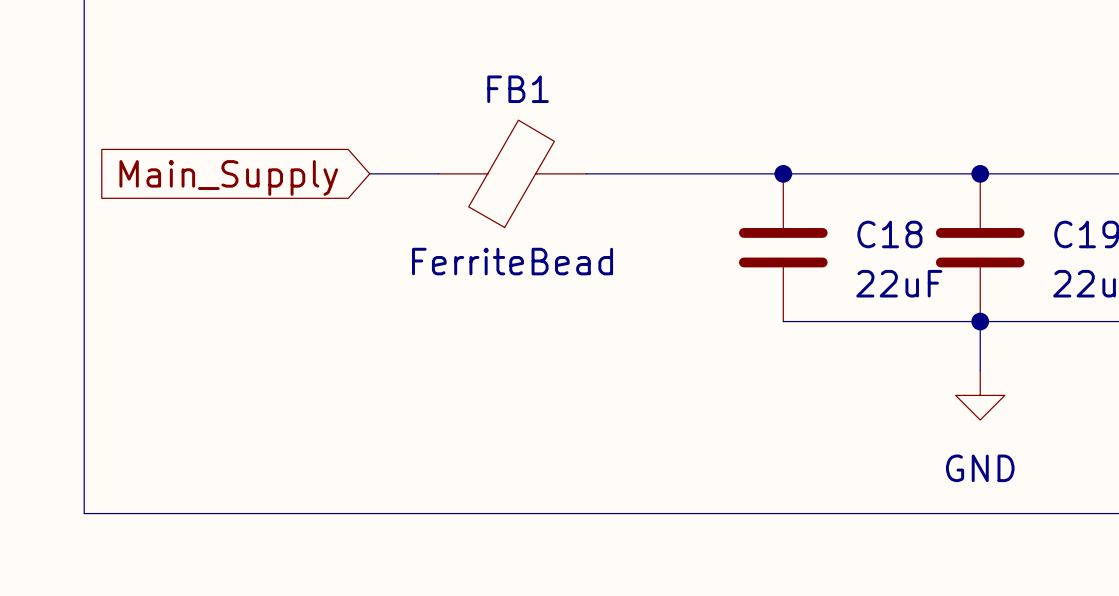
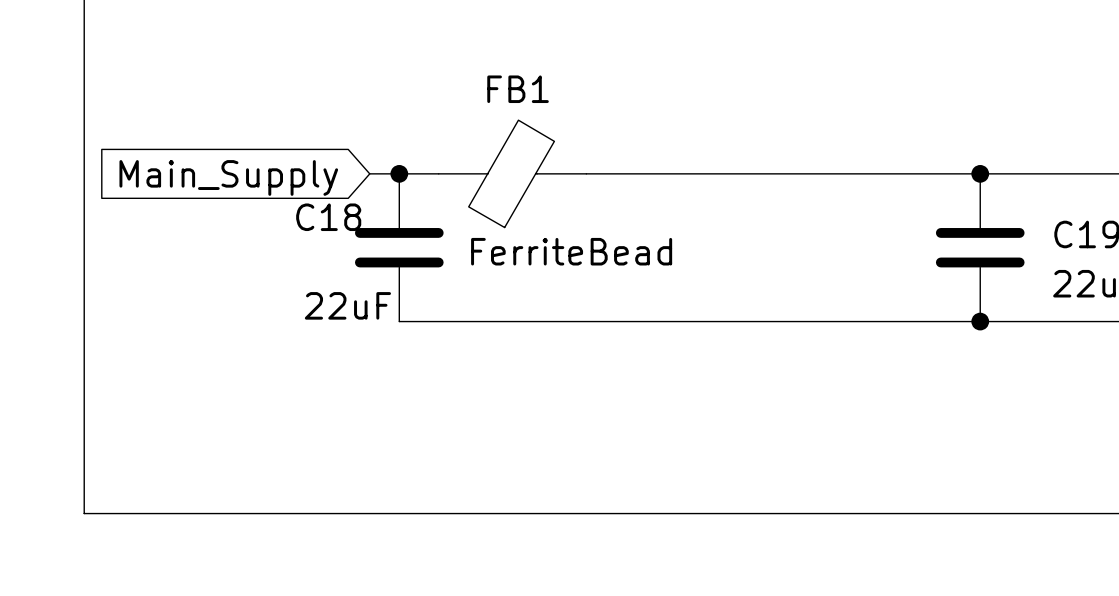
junction: none -> (399, 173)
junction: (783, 173) -> none
C18 name position: C18 (889, 234) -> C18 (328, 217)
C18 position: (783, 247) -> (399, 247)
FB1 value position: FerriteBead (512, 261) -> FerriteBead (571, 251)
C18 value position: 22uF (899, 283) -> 22uF (347, 305)
wire: none -> (399, 321) (783, 321)
wire: (980, 321) (980, 370) -> none
power symbol: GND (980, 395) -> none

